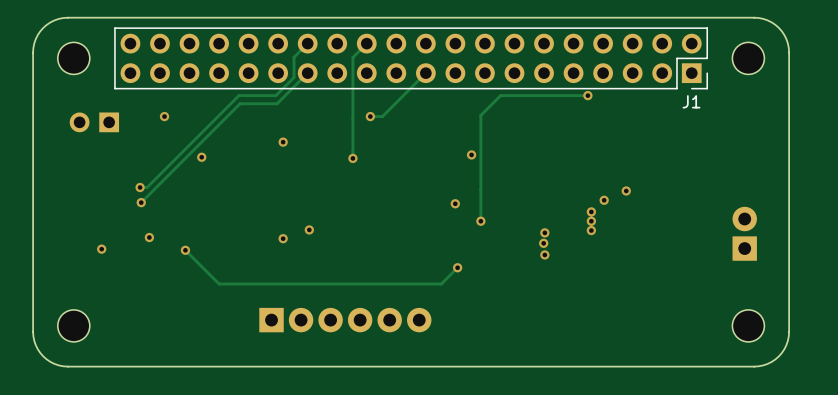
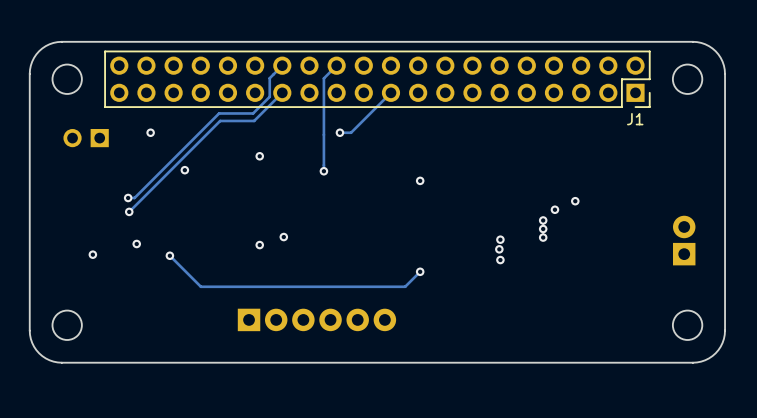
track: (587, 95) (500, 95) (480, 115) (480, 221) -> none
via: (587, 95) -> none
via: (471, 154) -> none
via: none -> (420, 180)
via: (455, 203) -> none
via: (480, 221) -> none

